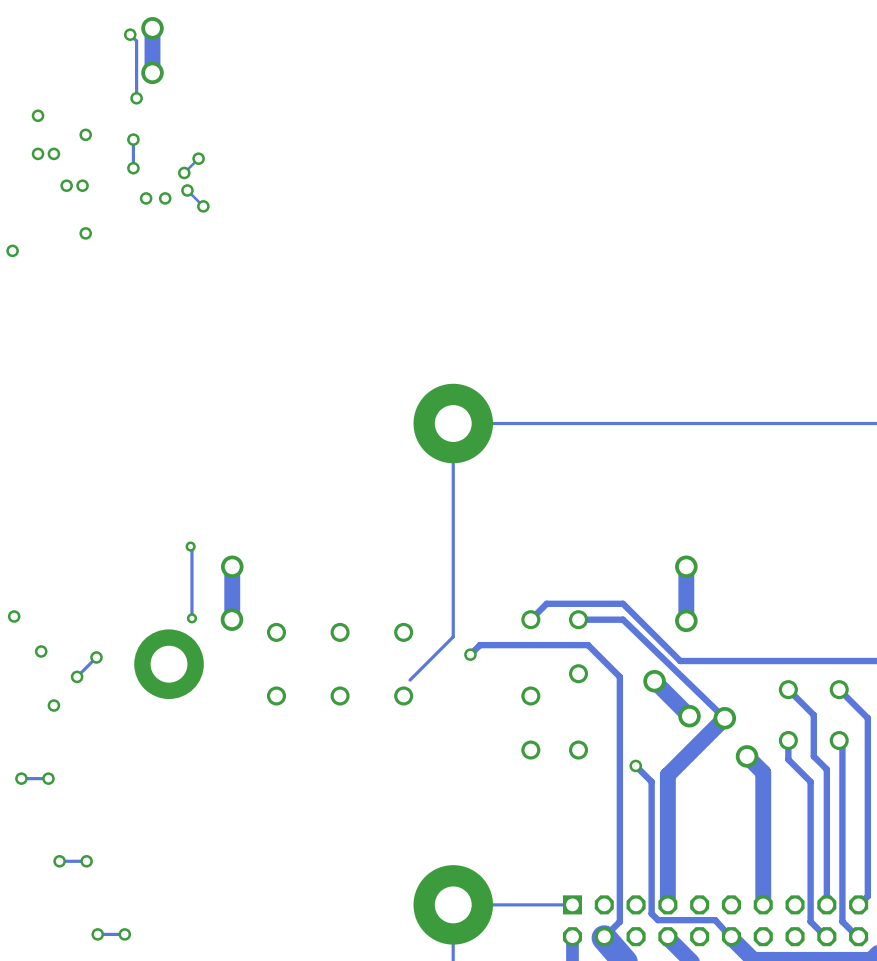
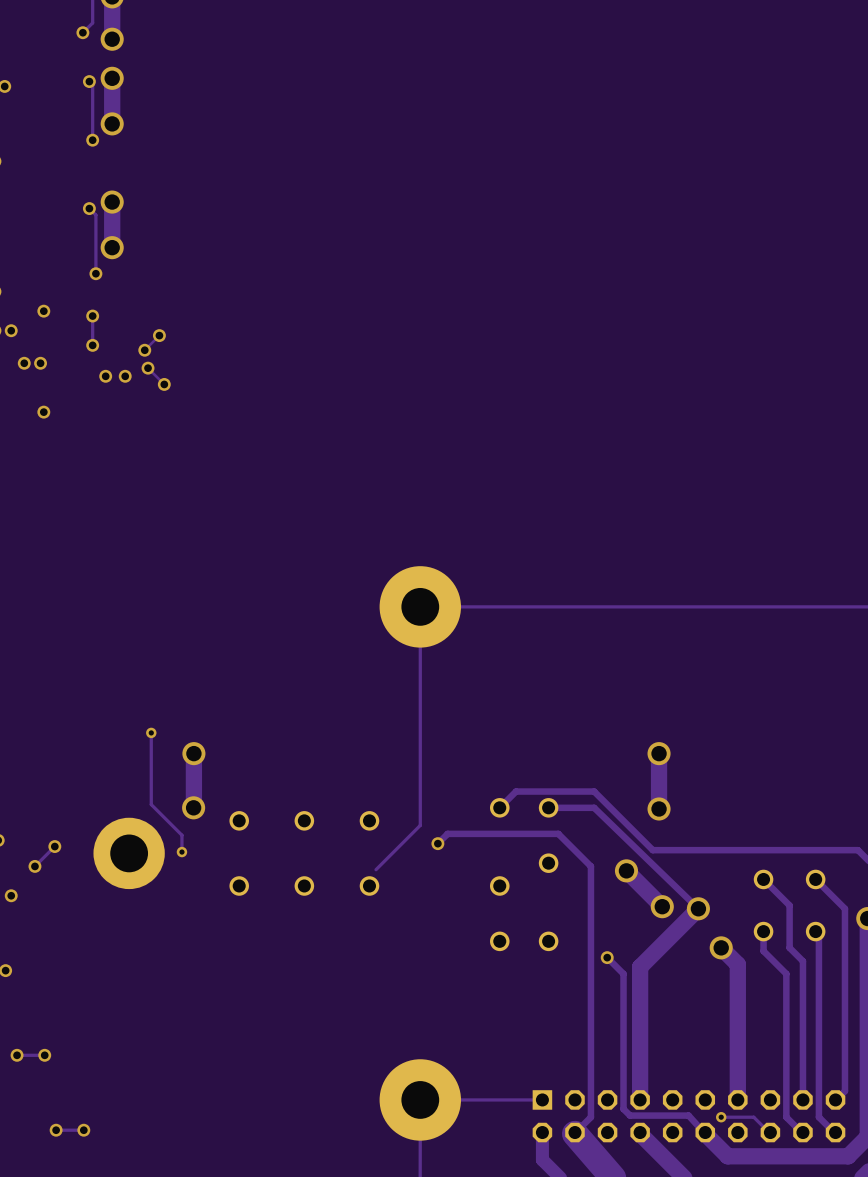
track: (190, 546) (191, 618) -> (151, 732) (151, 804) (181, 835) (181, 852)
via position: (191, 618) -> (181, 852)
track: none -> (721, 1117) (753, 1117) (770, 1132)
via: none -> (721, 1117)

